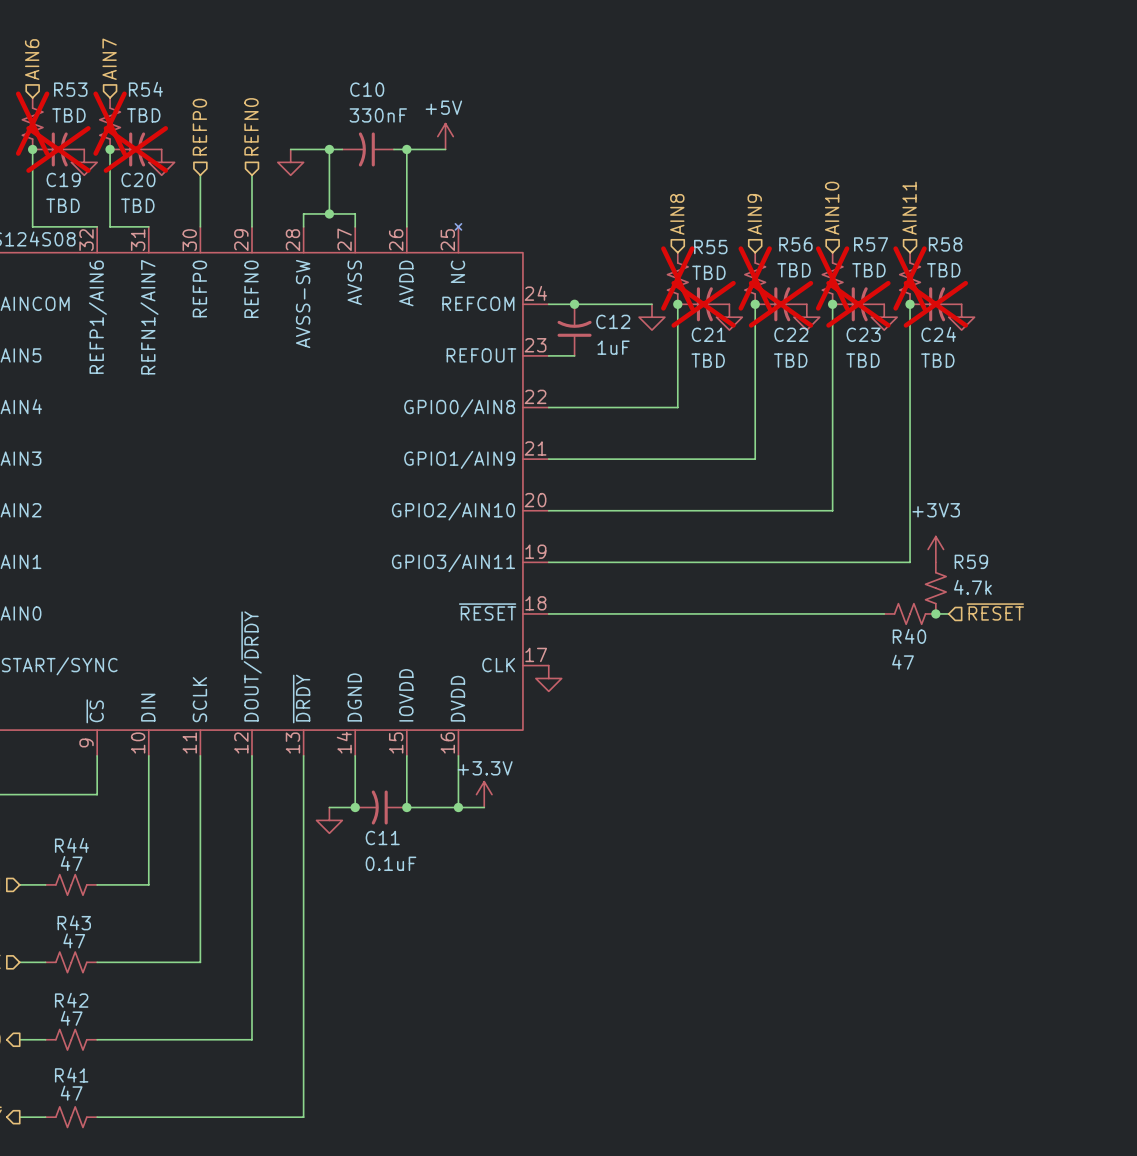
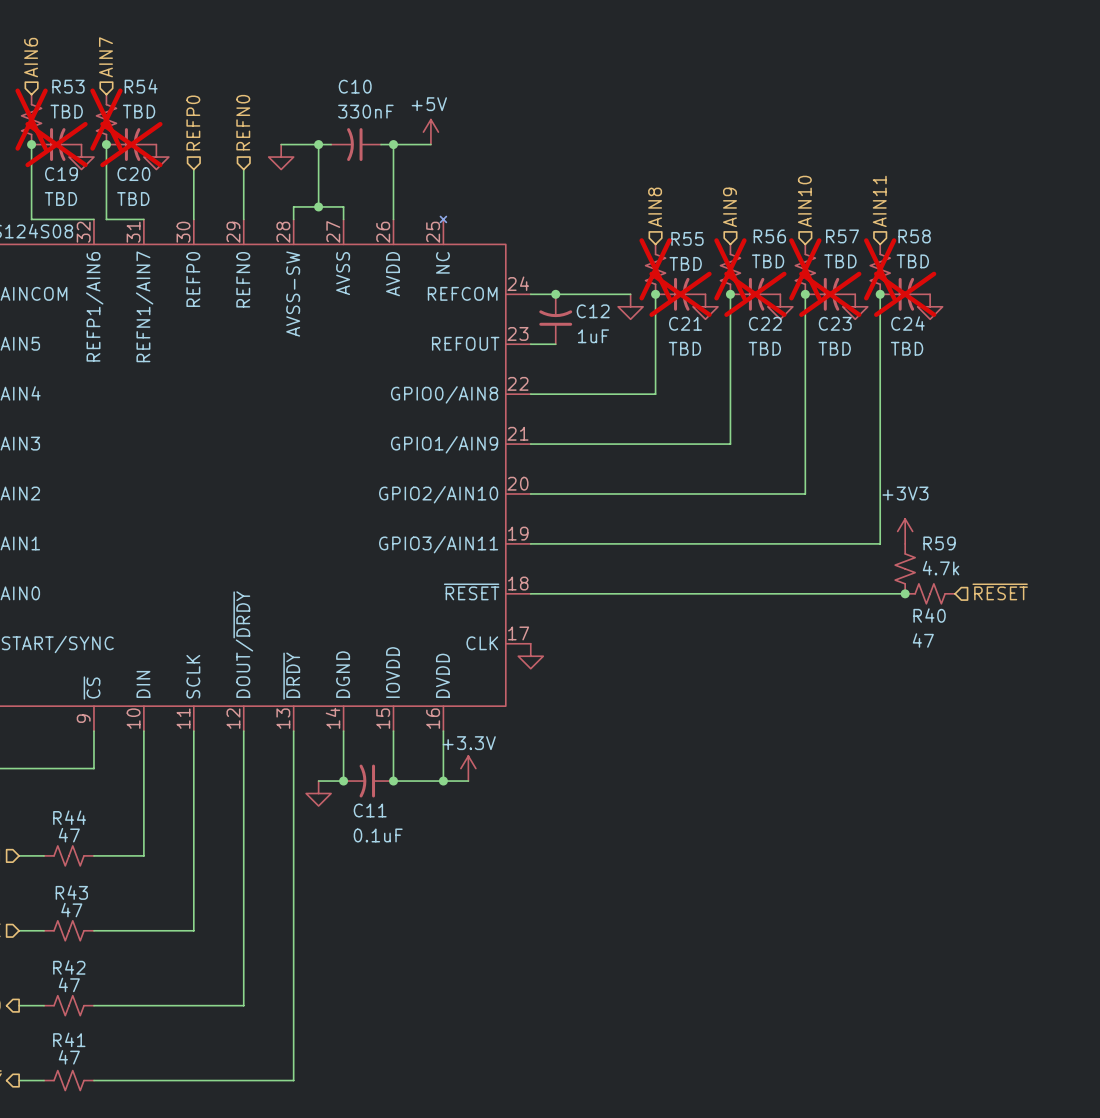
hierarchical label position: ~{RESET} (995, 612) -> ~{RESET} (1000, 591)
R40 position: (910, 613) -> (930, 593)

